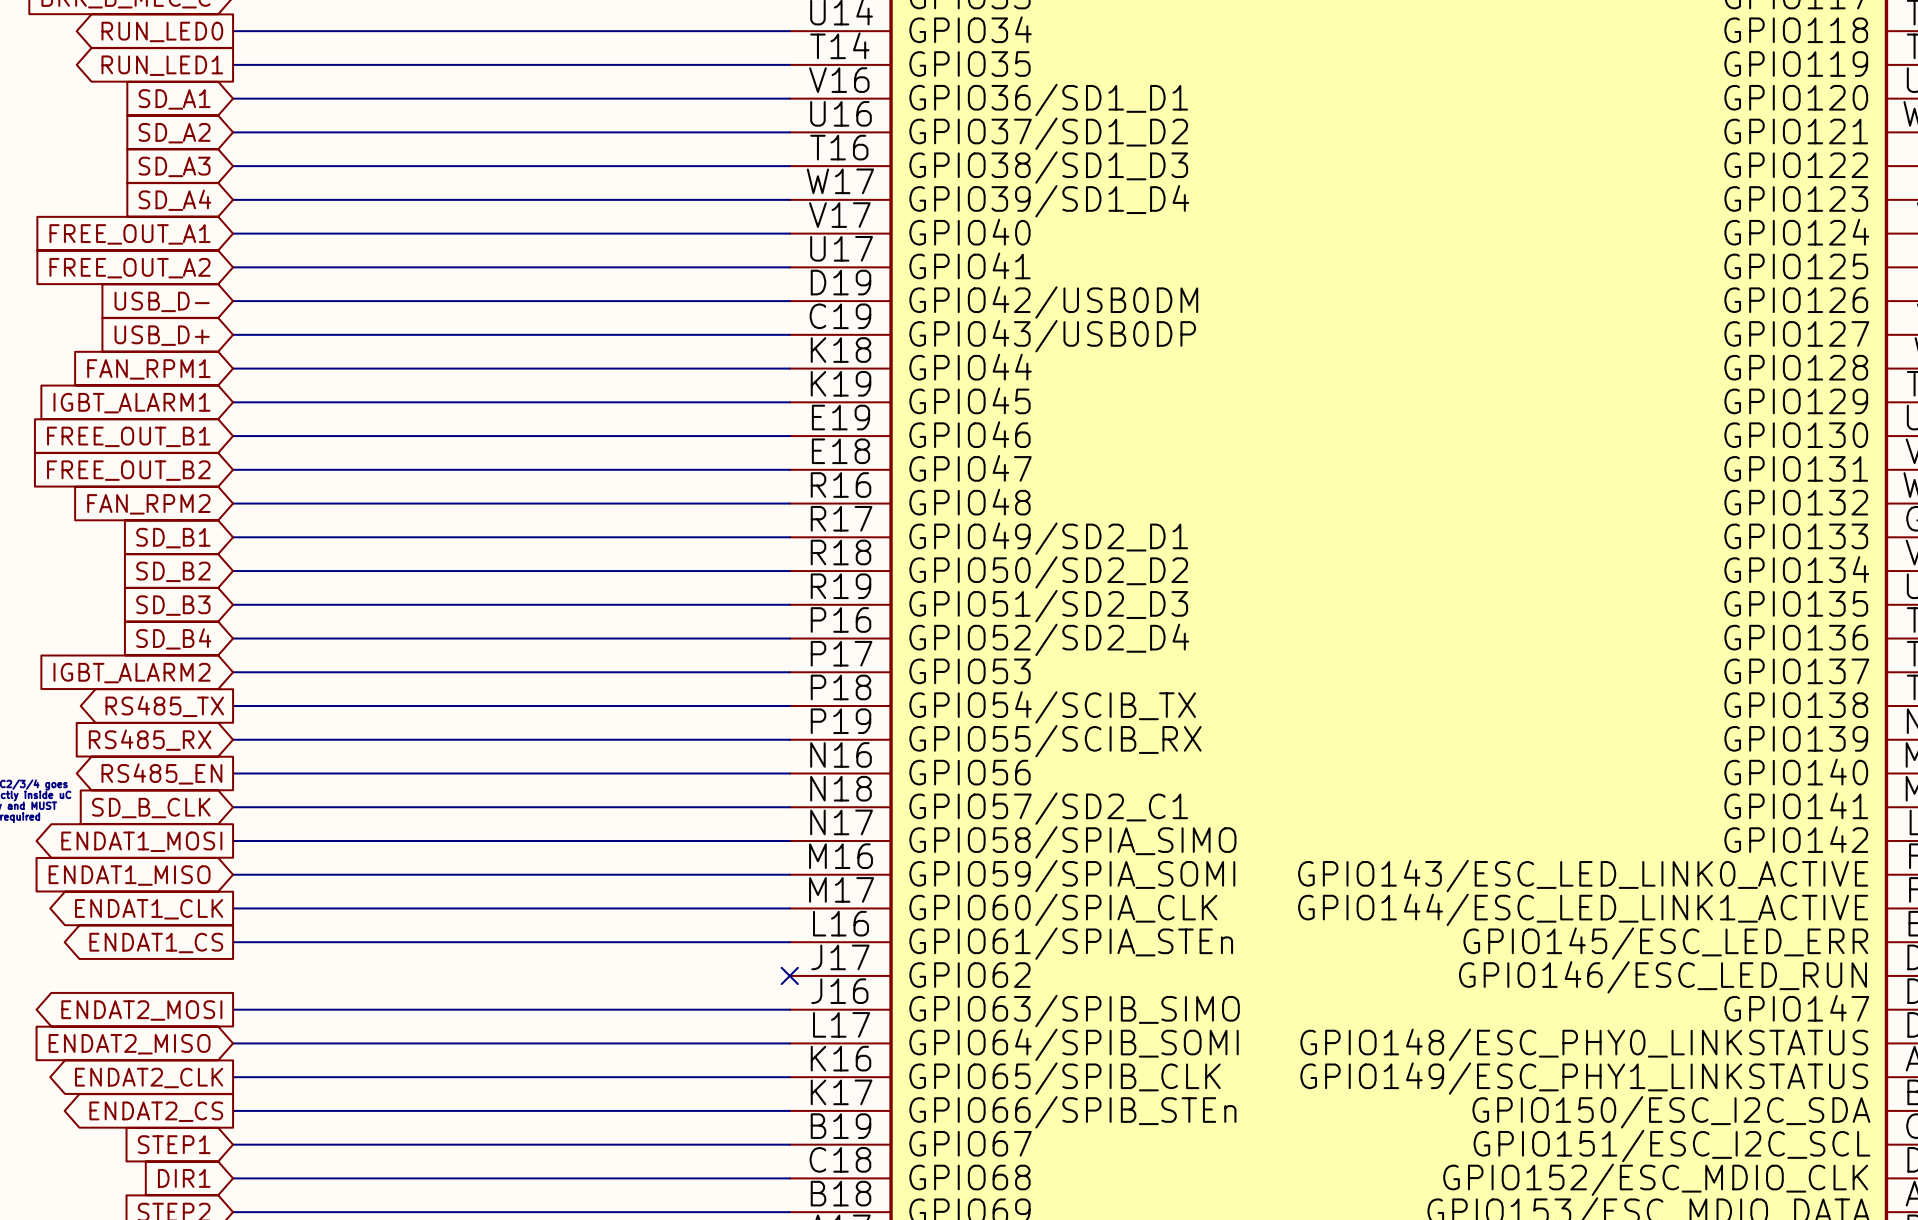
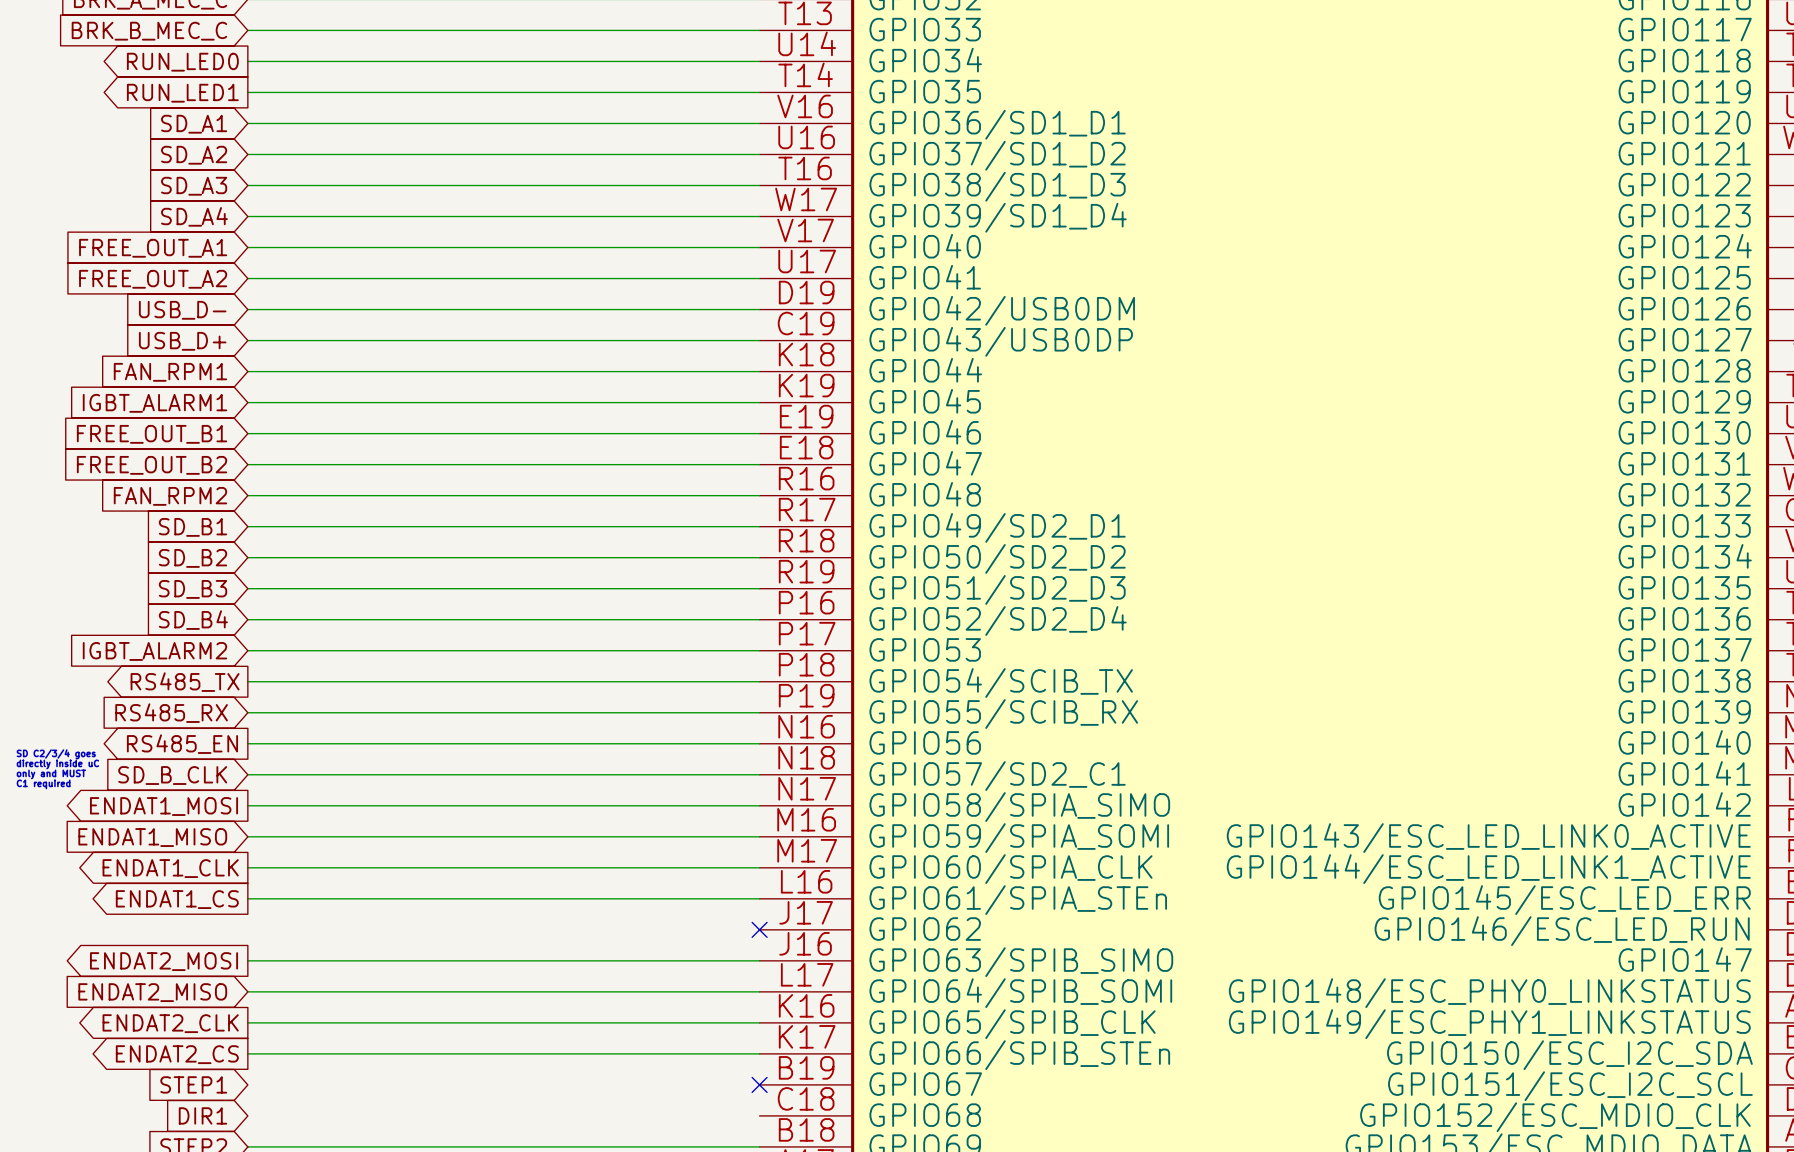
wire: (233, 1144) (789, 1144) -> none
no-connect mark: none -> (759, 1084)
wire: (233, 1178) (789, 1178) -> none

